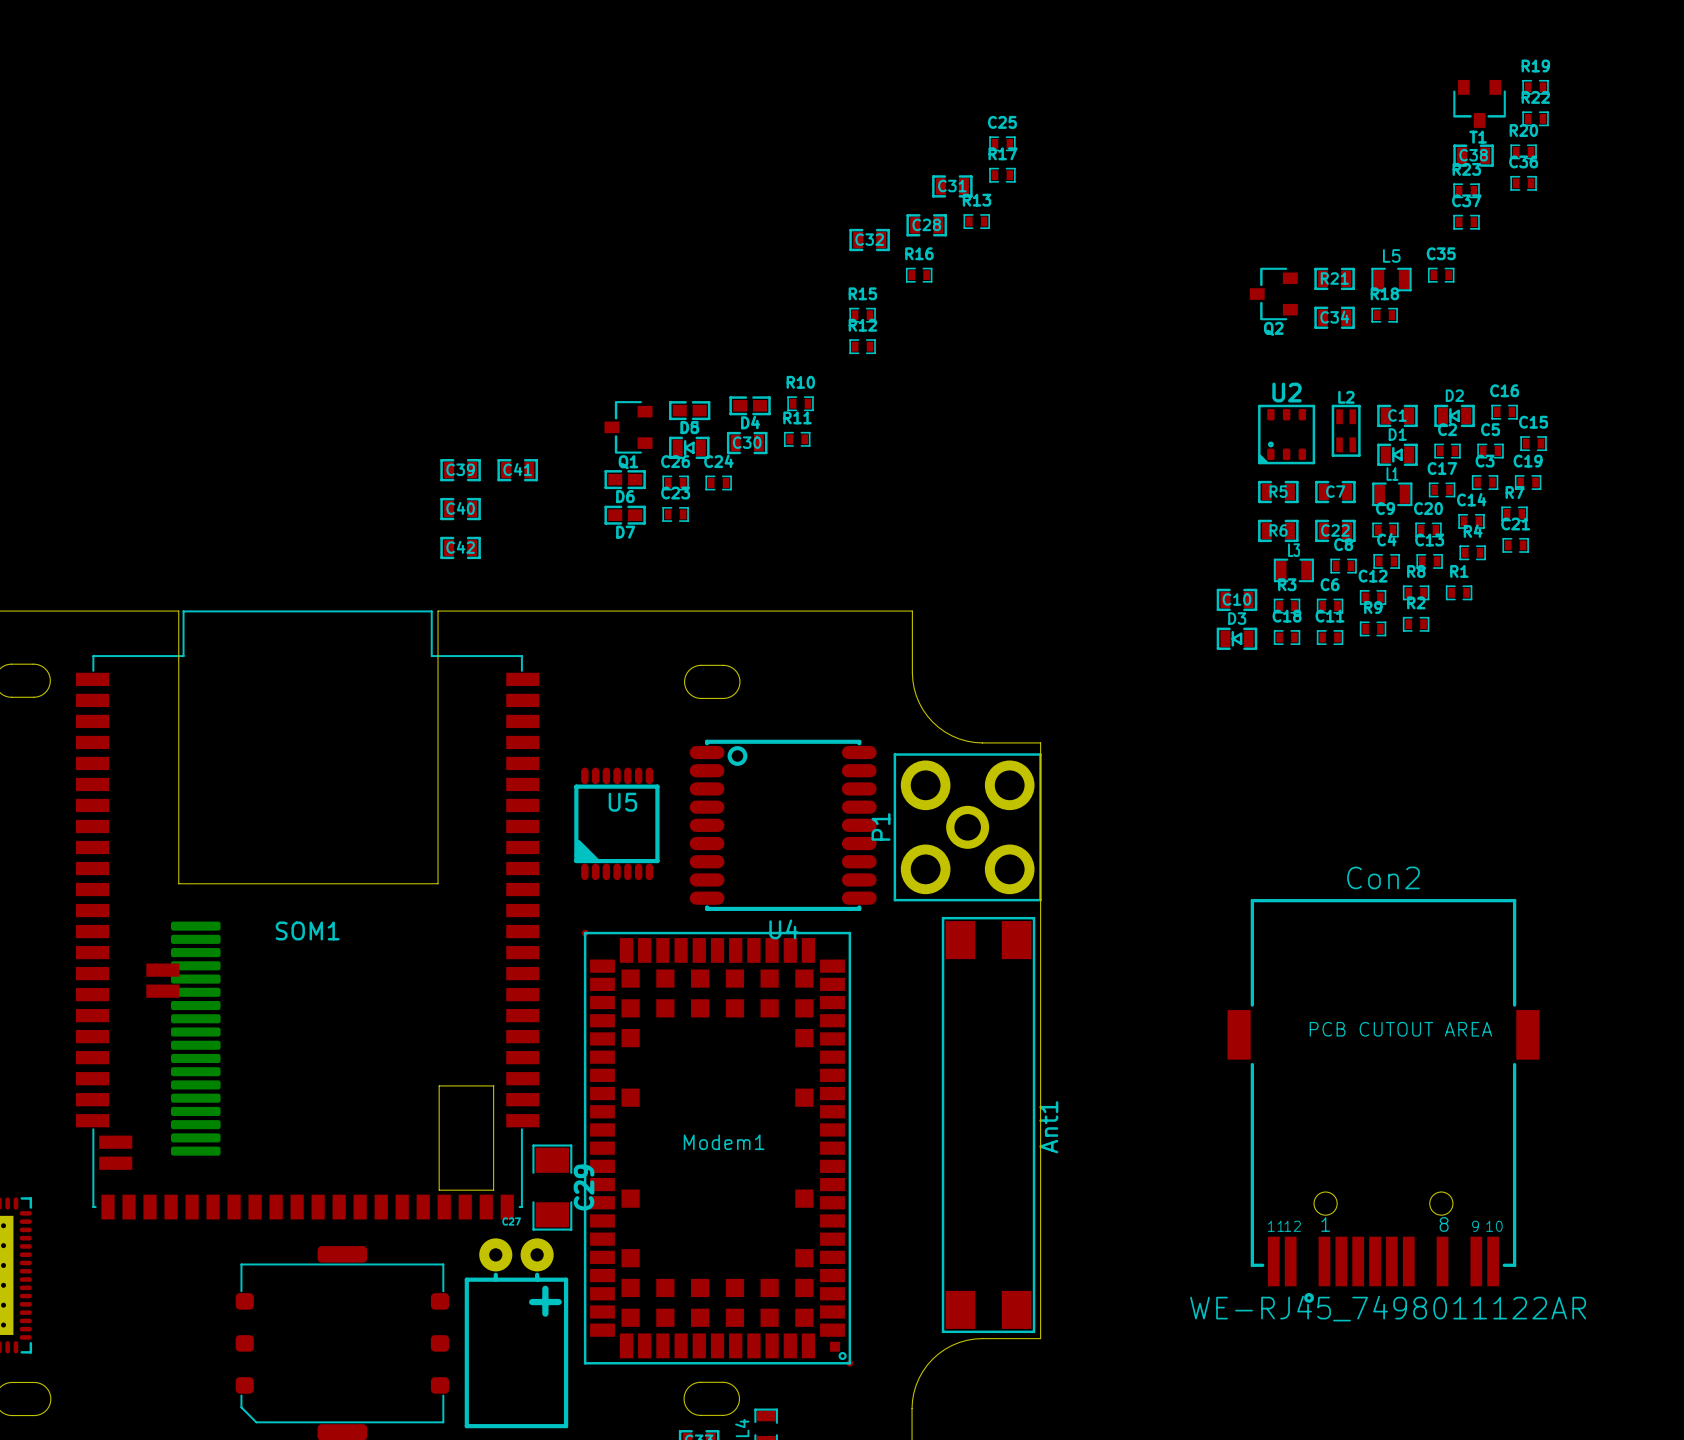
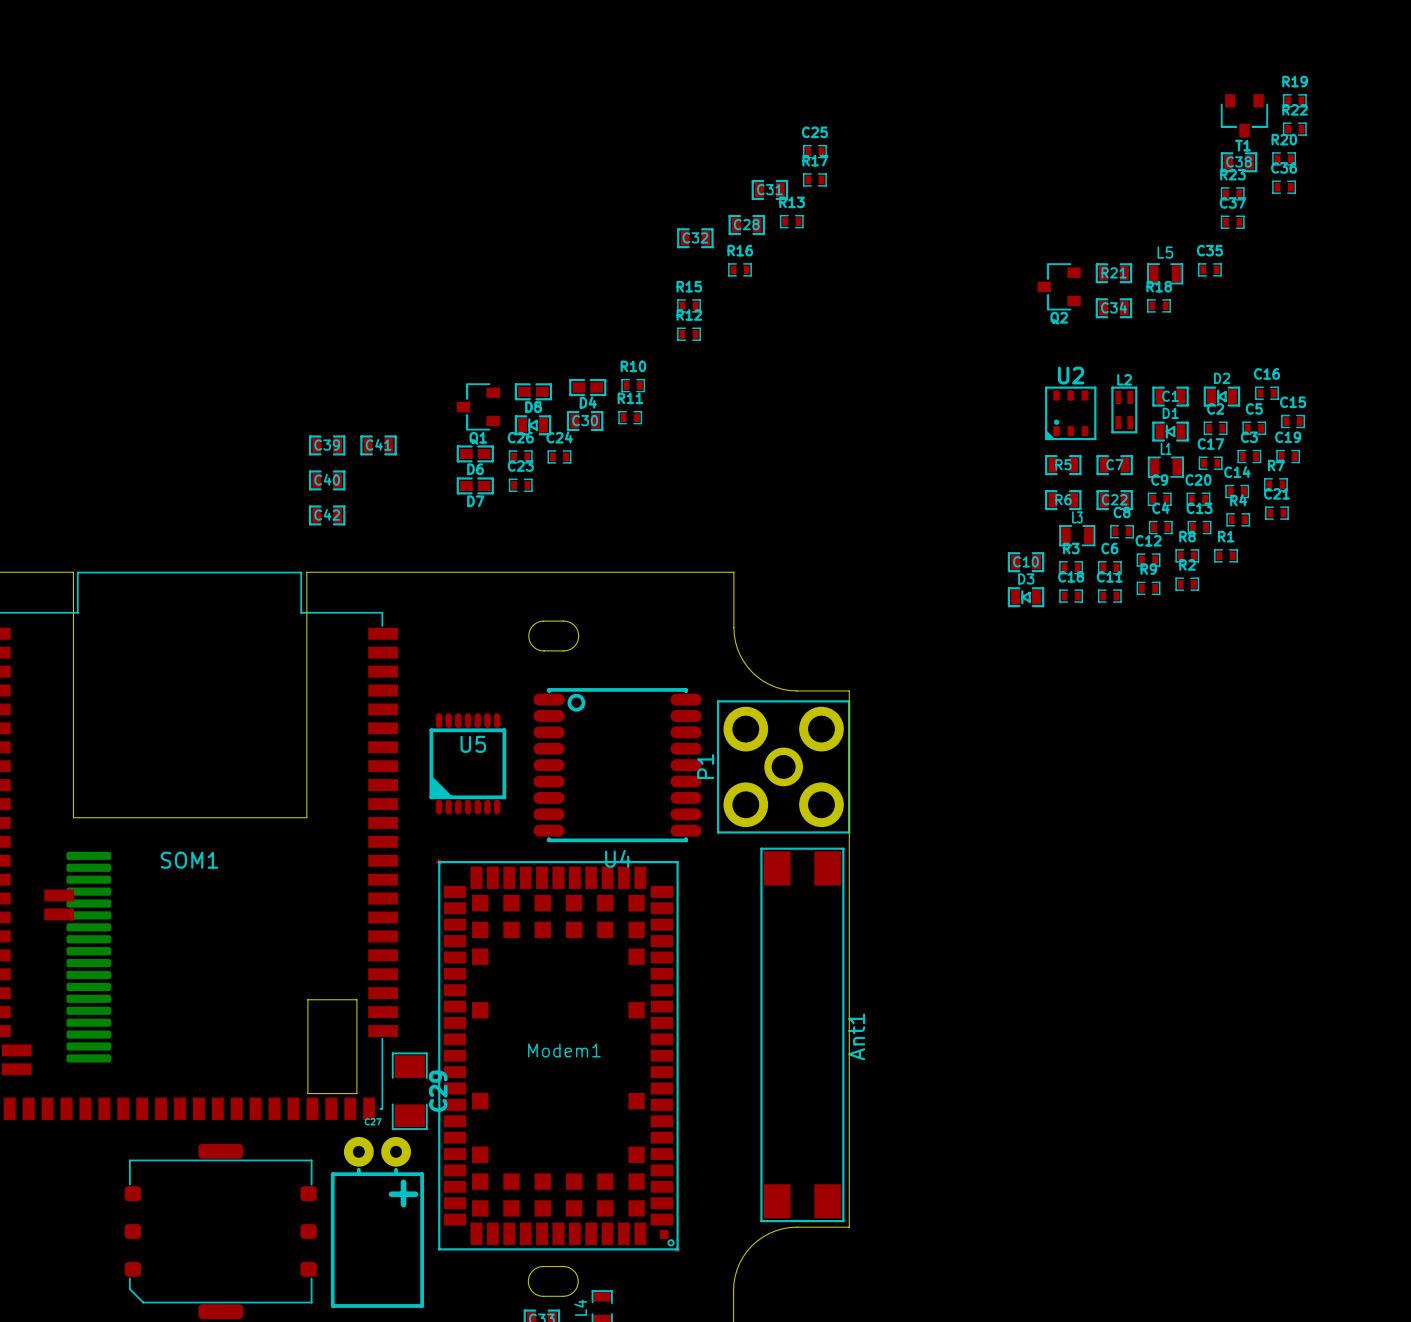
Con2: WE-RJ45_7498011122AR (1383, 1100) -> none

